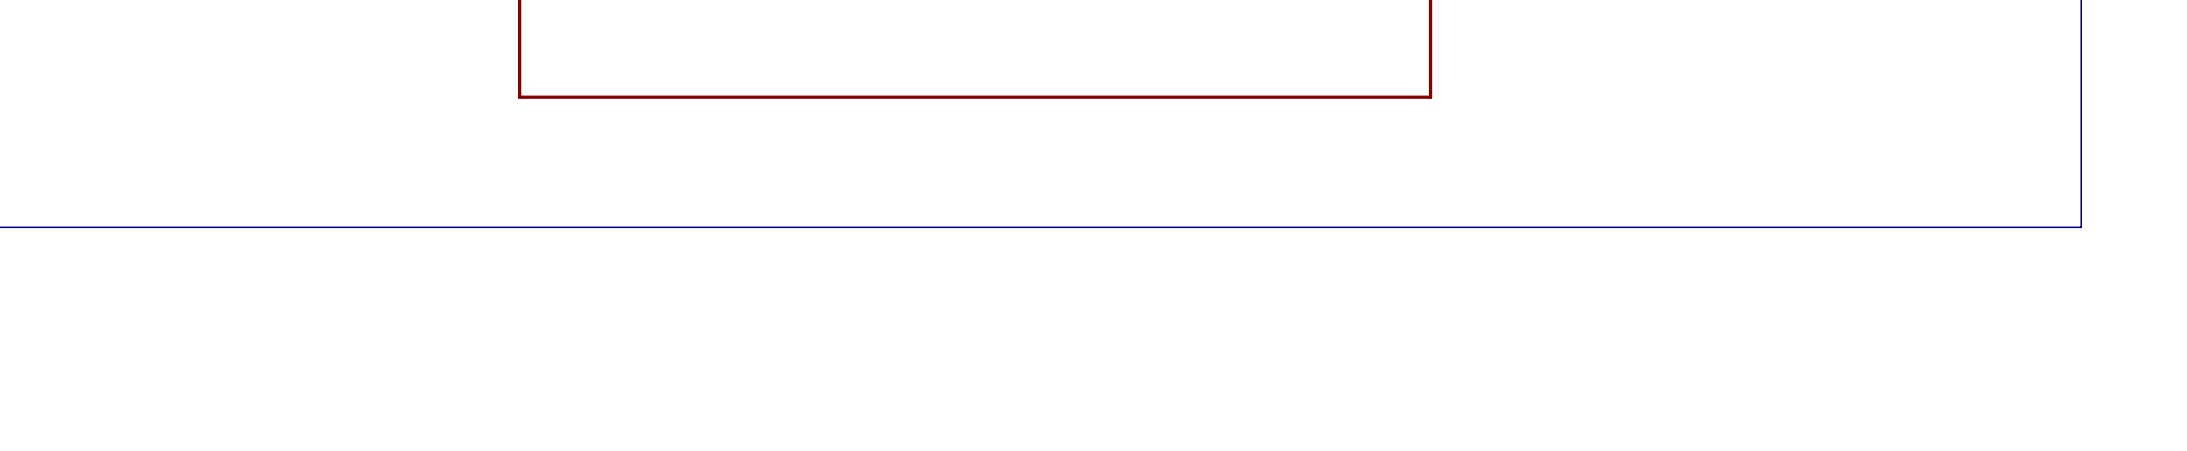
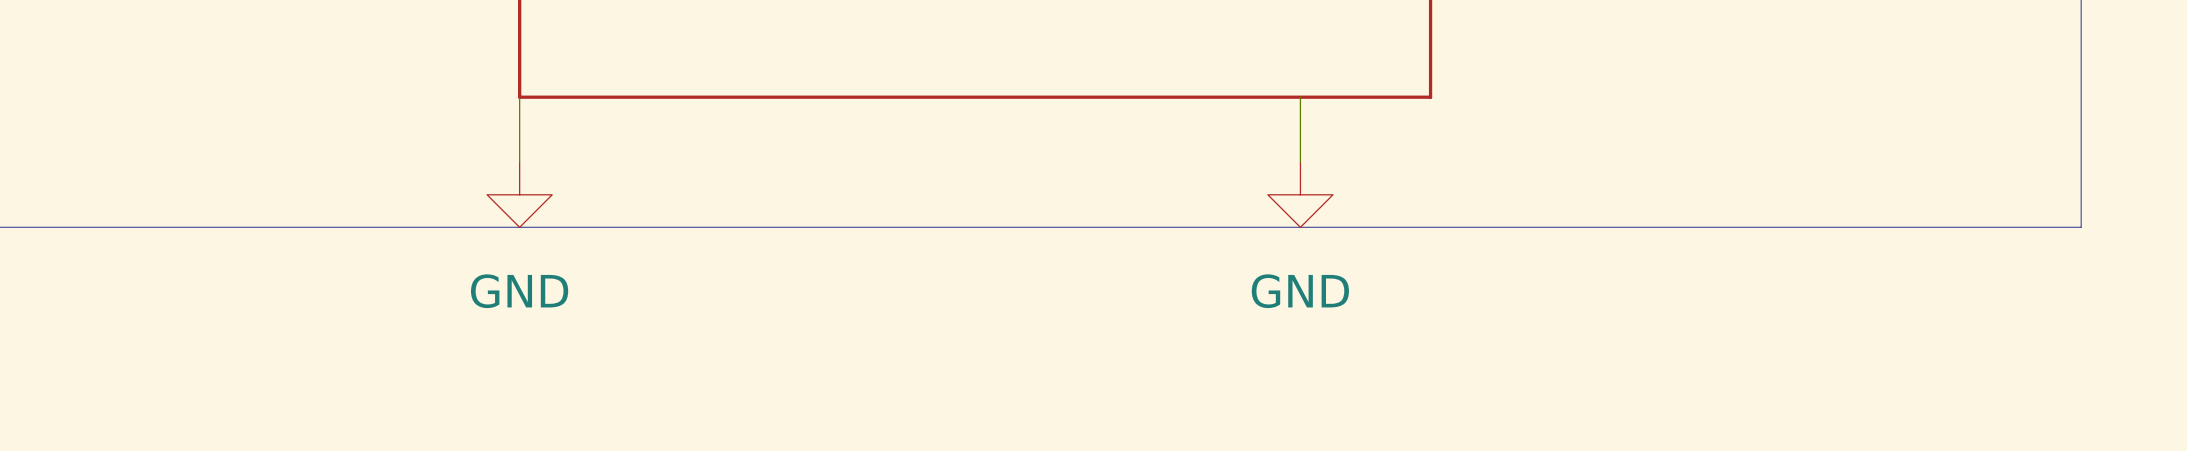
wire: none -> (519, 97) (519, 162)
wire: none -> (1300, 97) (1300, 162)
power symbol: none -> GND (519, 194)
power symbol: none -> GND (1300, 194)

